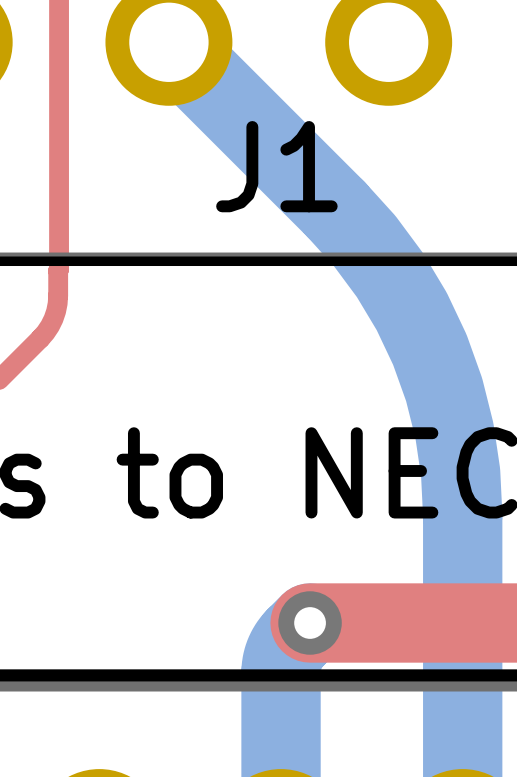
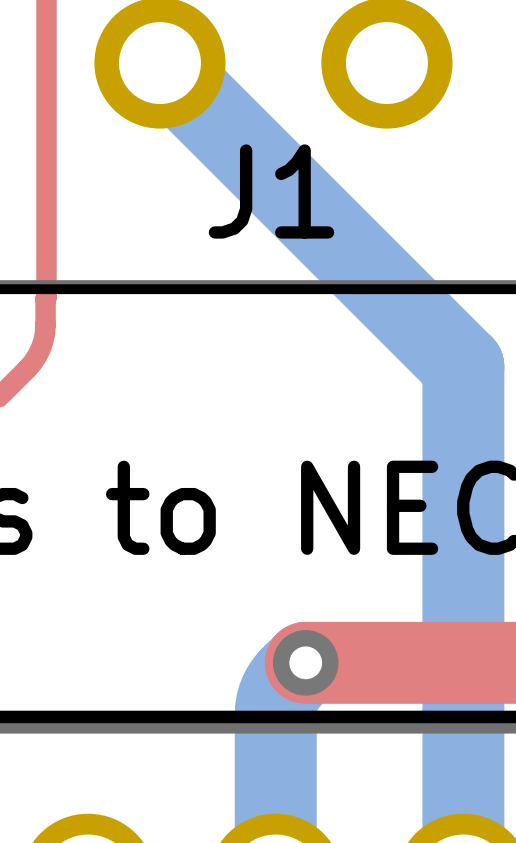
bottom track: (336, 209) (364, 241) (389, 275) (411, 311) (429, 349) (444, 389) (454, 430) (460, 472) (462, 514) -> (332, 235) (463, 366) (463, 551)

